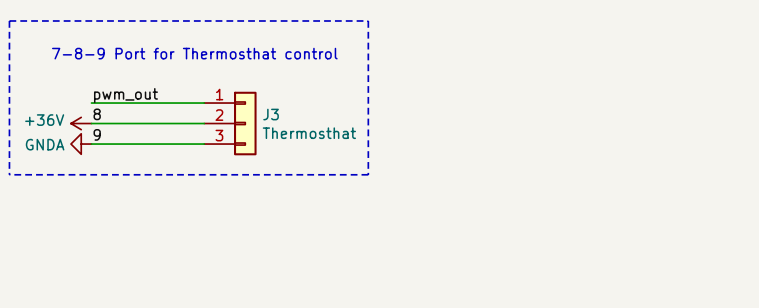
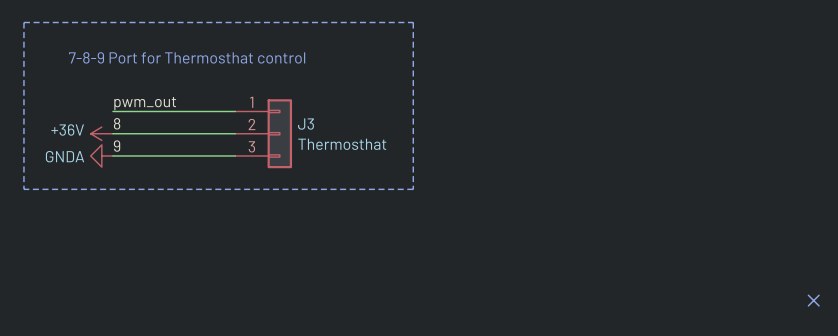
no-connect mark: none -> (813, 300)

